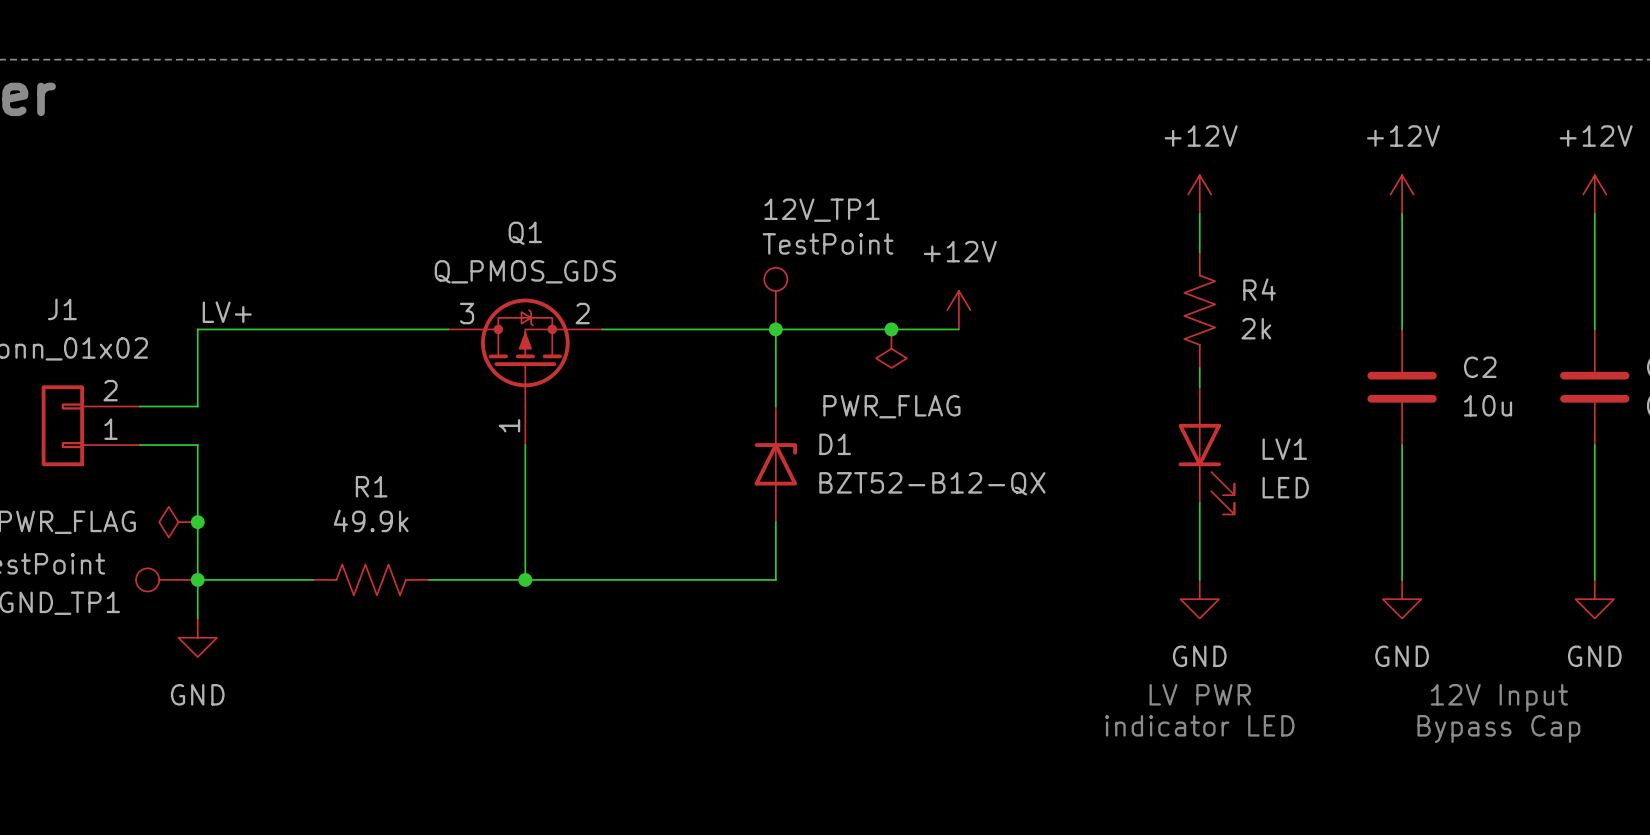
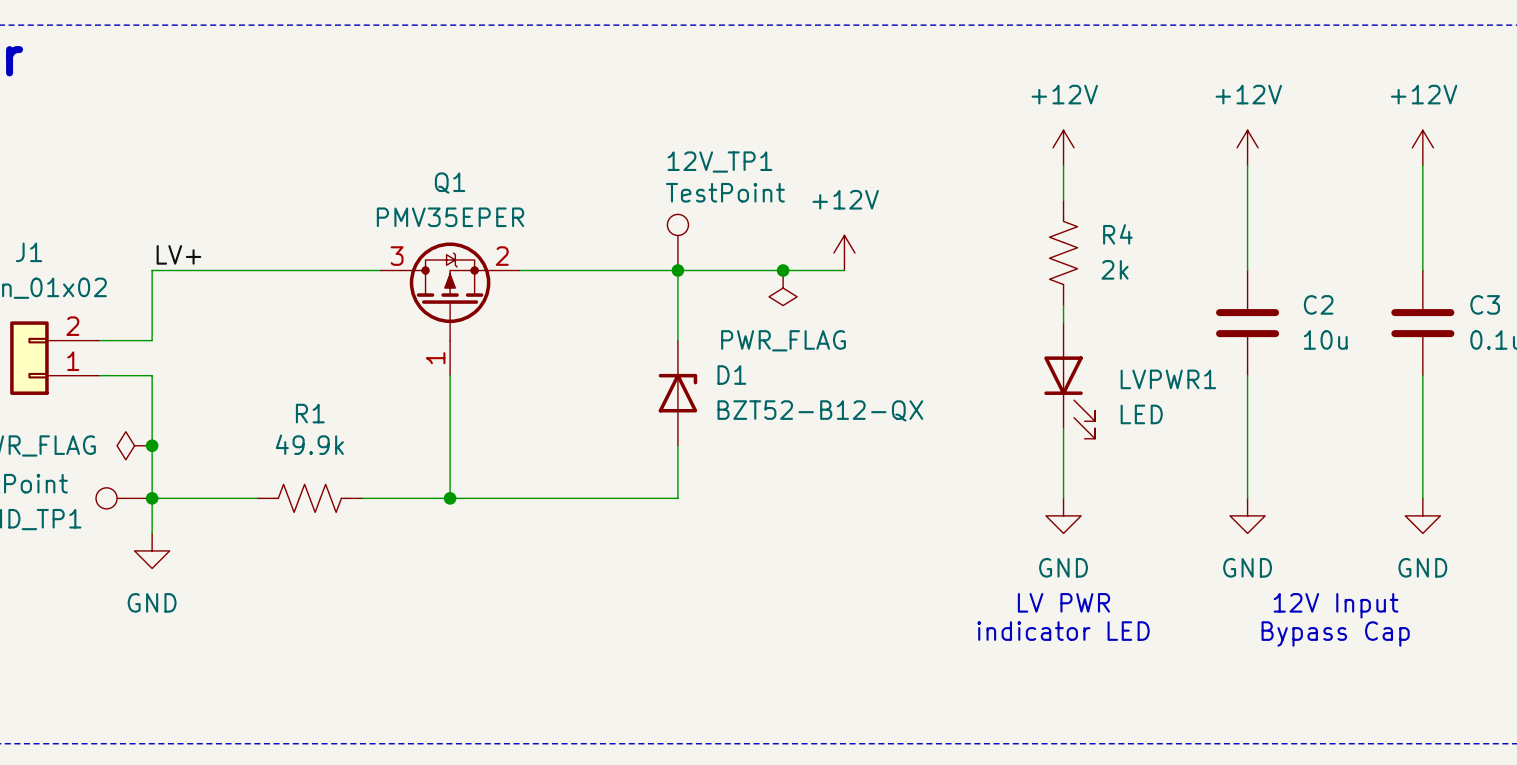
Q1 value: Q_PMOS_GDS (525, 271) -> PMV35EPER (450, 217)
LV1 name: LV1 (1284, 449) -> LVPWR1 (1168, 379)

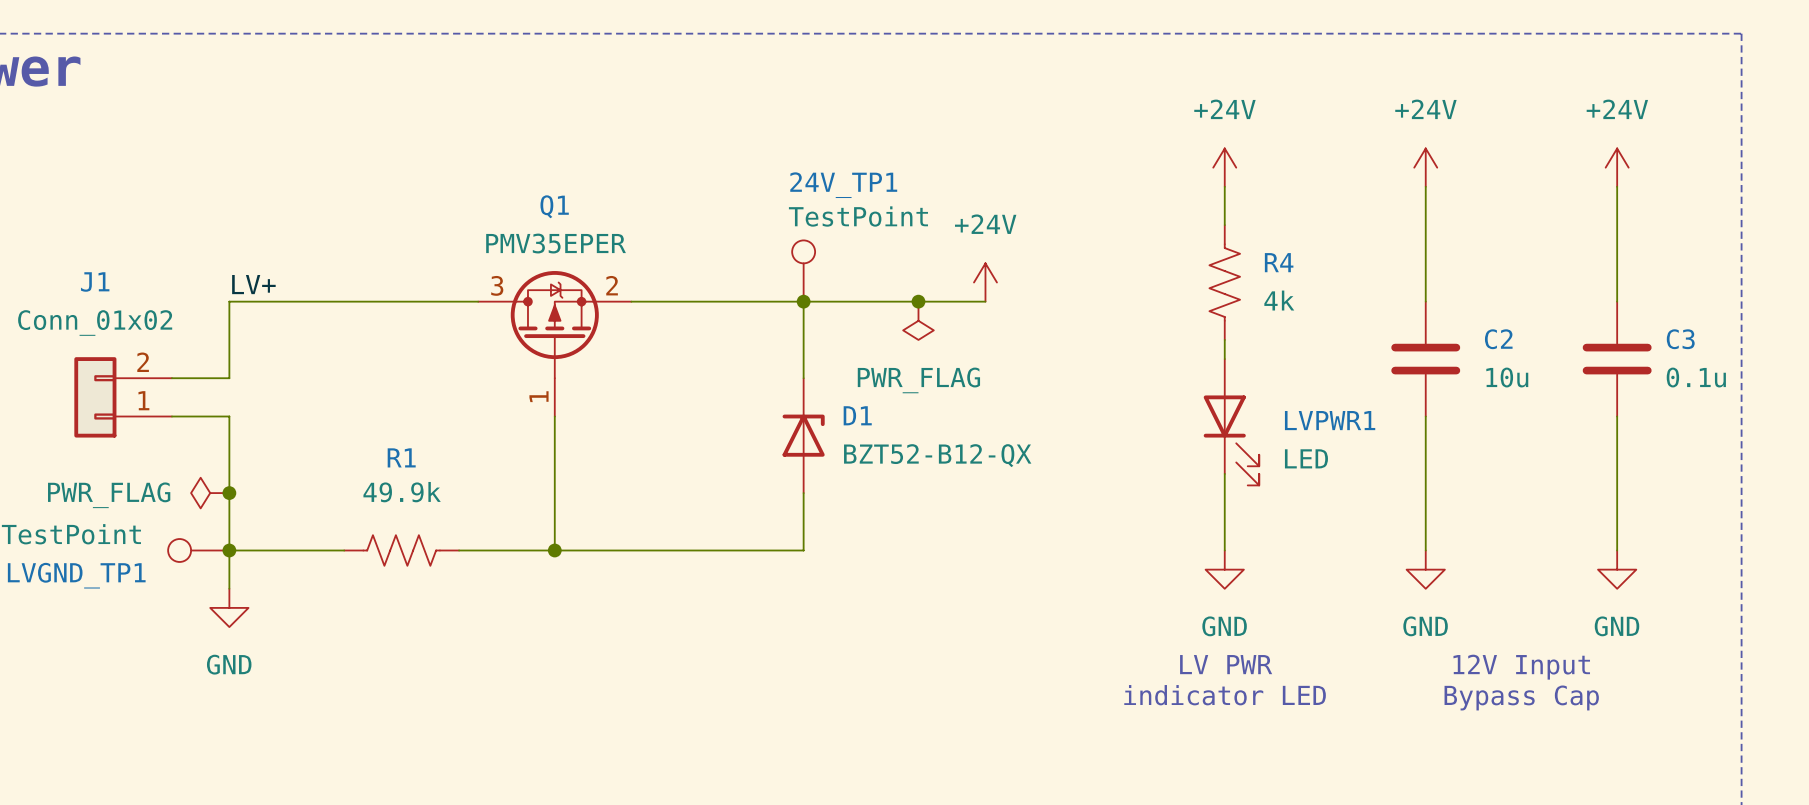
power symbol: +12V (1063, 147) -> +24V (1224, 167)
power symbol: +12V (1247, 147) -> +24V (1425, 167)
power symbol: +12V (1422, 147) -> +24V (1617, 167)
12V_TP1 name: 12V_TP1 (719, 162) -> 24V_TP1 (843, 185)
power symbol: +12V (844, 252) -> +24V (985, 282)
R4 value: 2k (1115, 269) -> 4k (1279, 300)

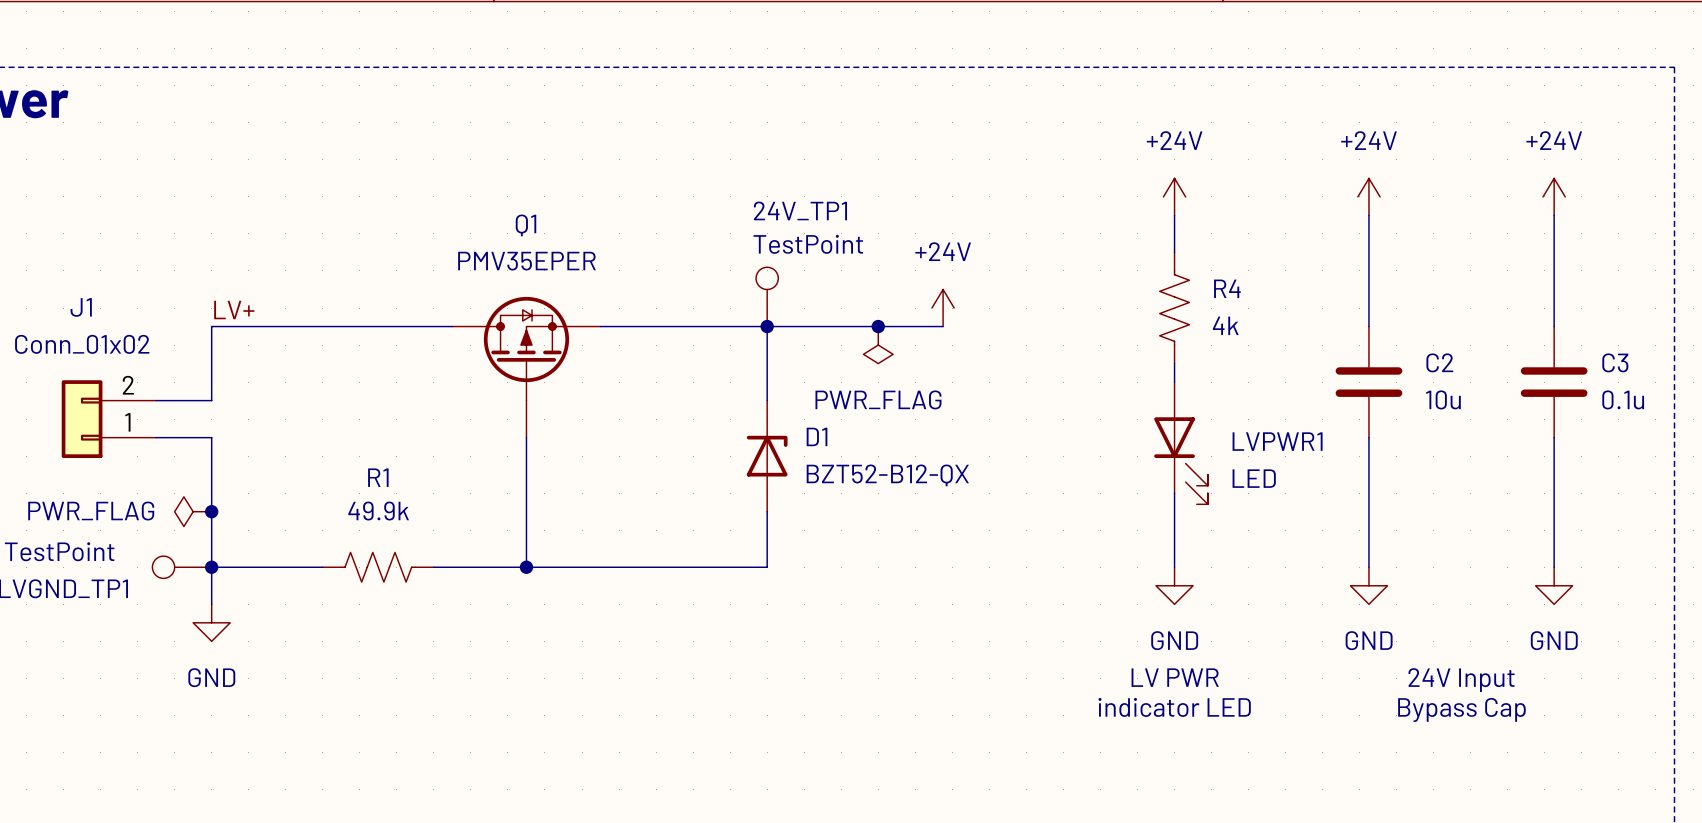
Q1 symbol: [478, 271, 632, 417] -> [452, 296, 601, 438]
text: 12V Input (1521, 667) -> 24V Input (1461, 680)

